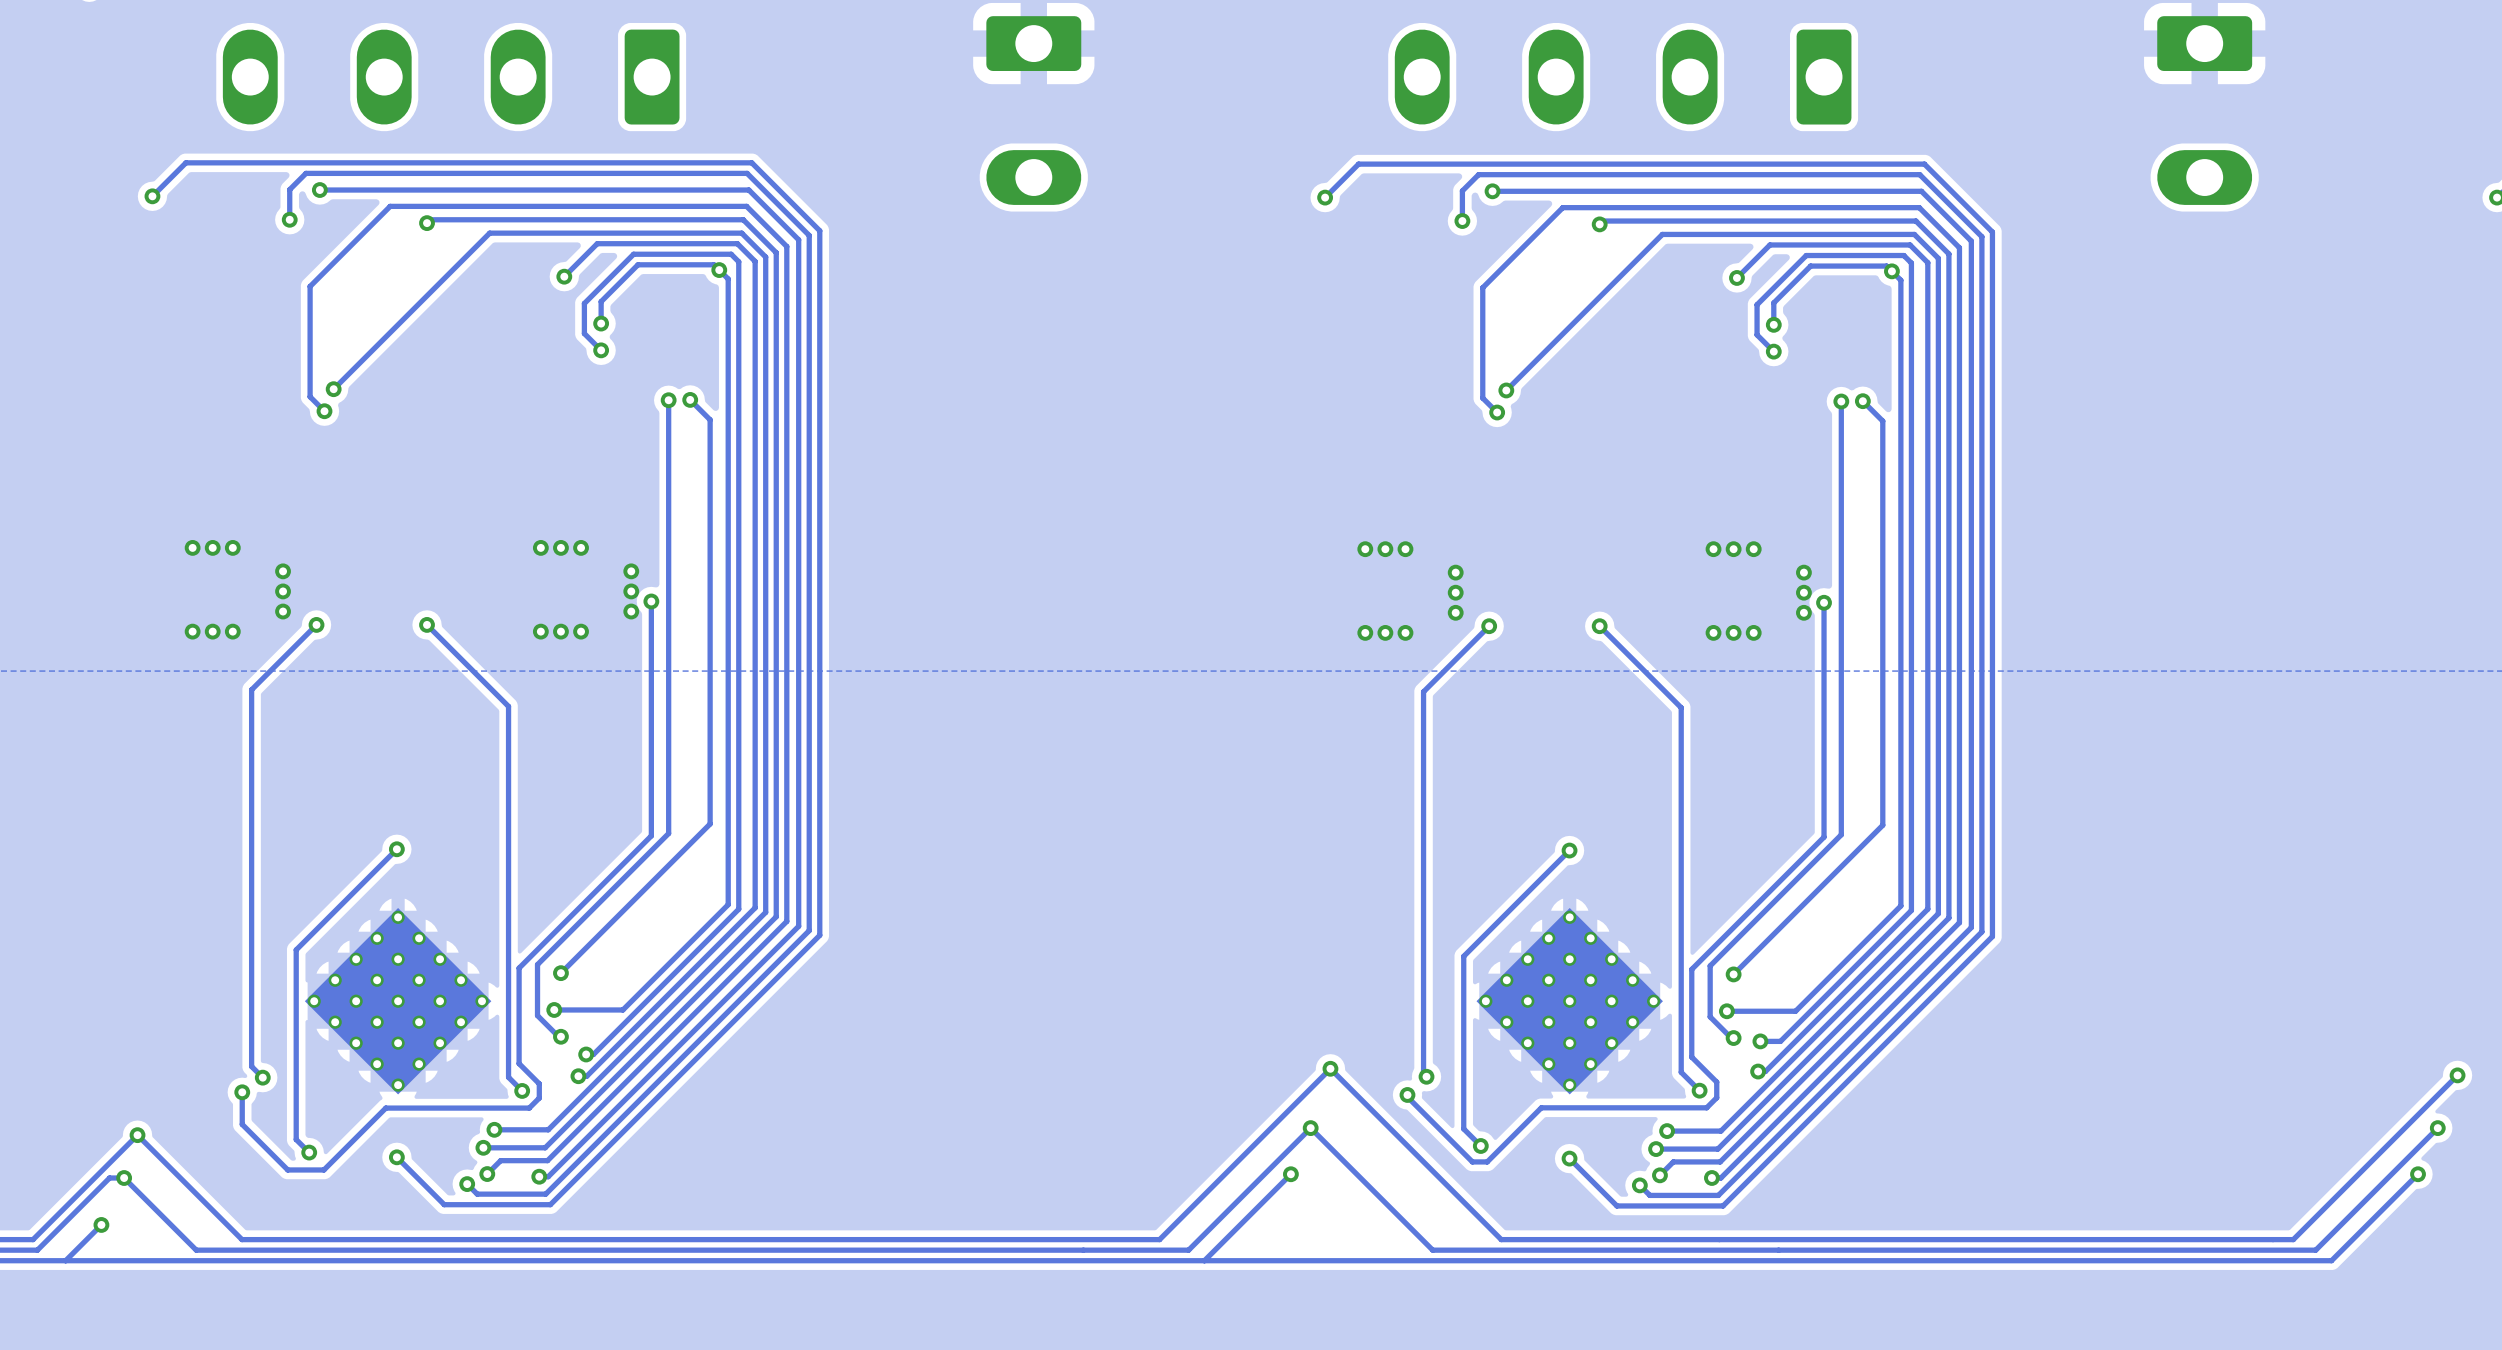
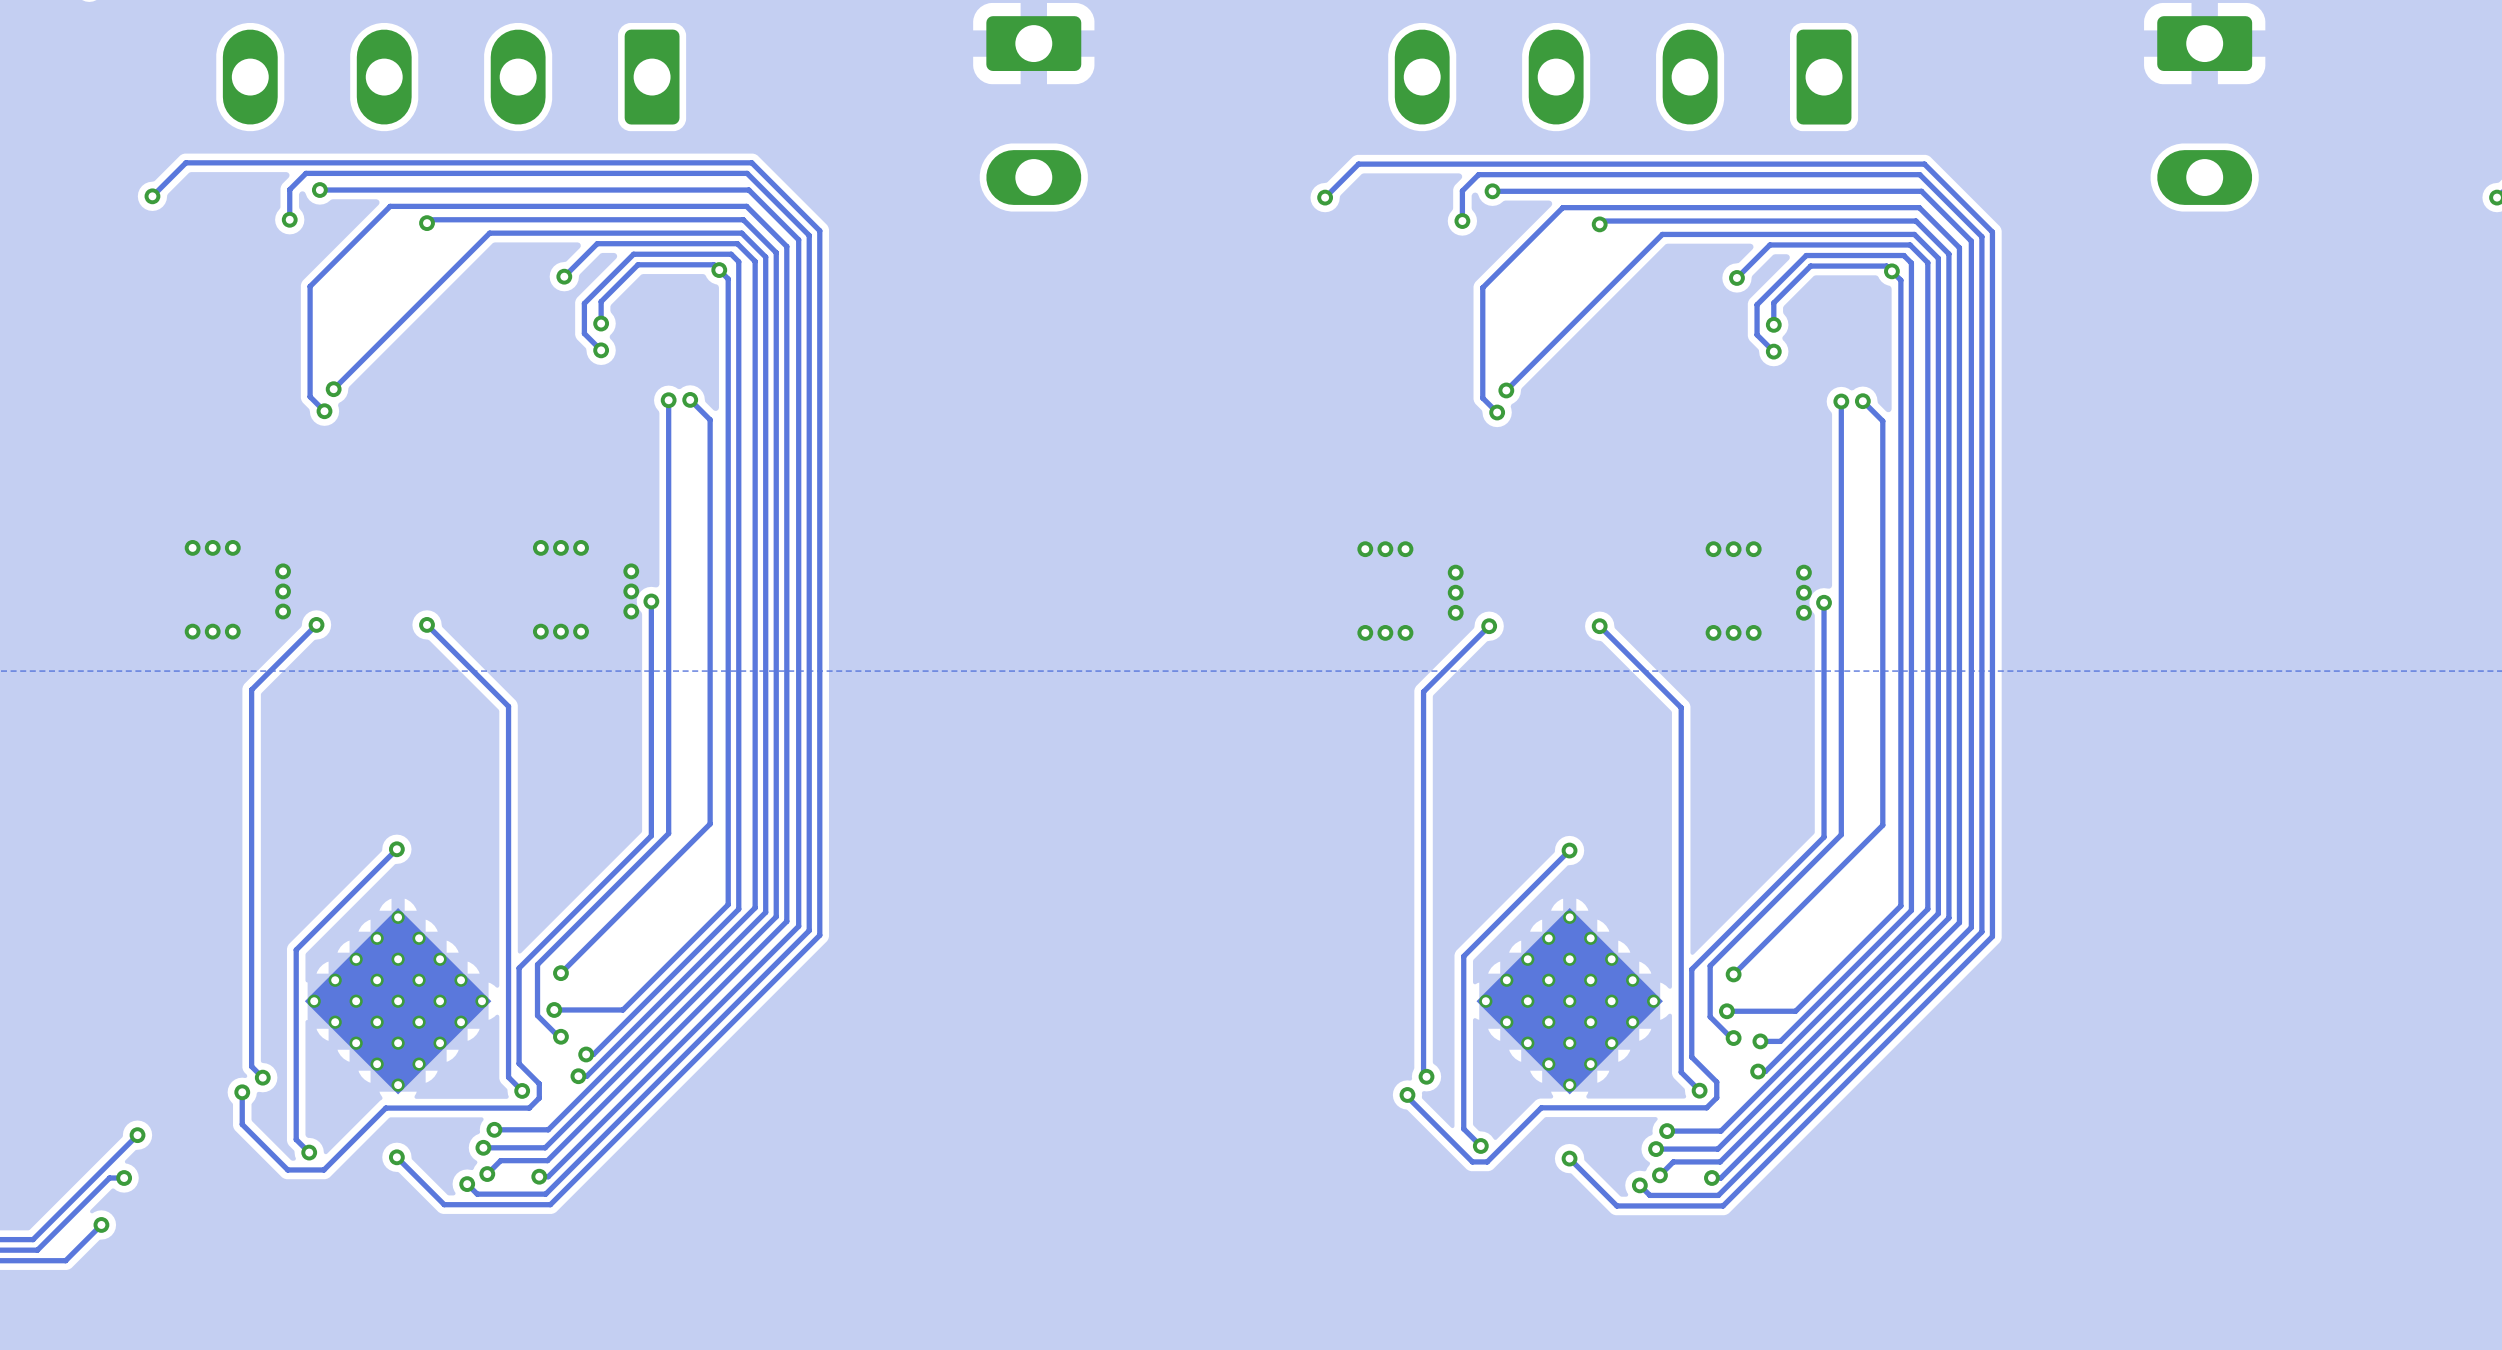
via: (1330, 1068) -> none
track: (2457, 1075) (2293, 1239) (1501, 1239) (1330, 1068) (1159, 1239) (241, 1239) (137, 1135) -> none
via: (2457, 1075) -> none
via: (1310, 1128) -> none
track: (2437, 1128) (2315, 1250) (1432, 1250) (1310, 1128) (1188, 1250) (196, 1250) (124, 1178) -> none
via: (2437, 1128) -> none
track: (1290, 1174) (1204, 1260) -> none
via: (1290, 1174) -> none
track: (2418, 1174) (2331, 1260) (65, 1260) -> none
via: (2418, 1174) -> none

